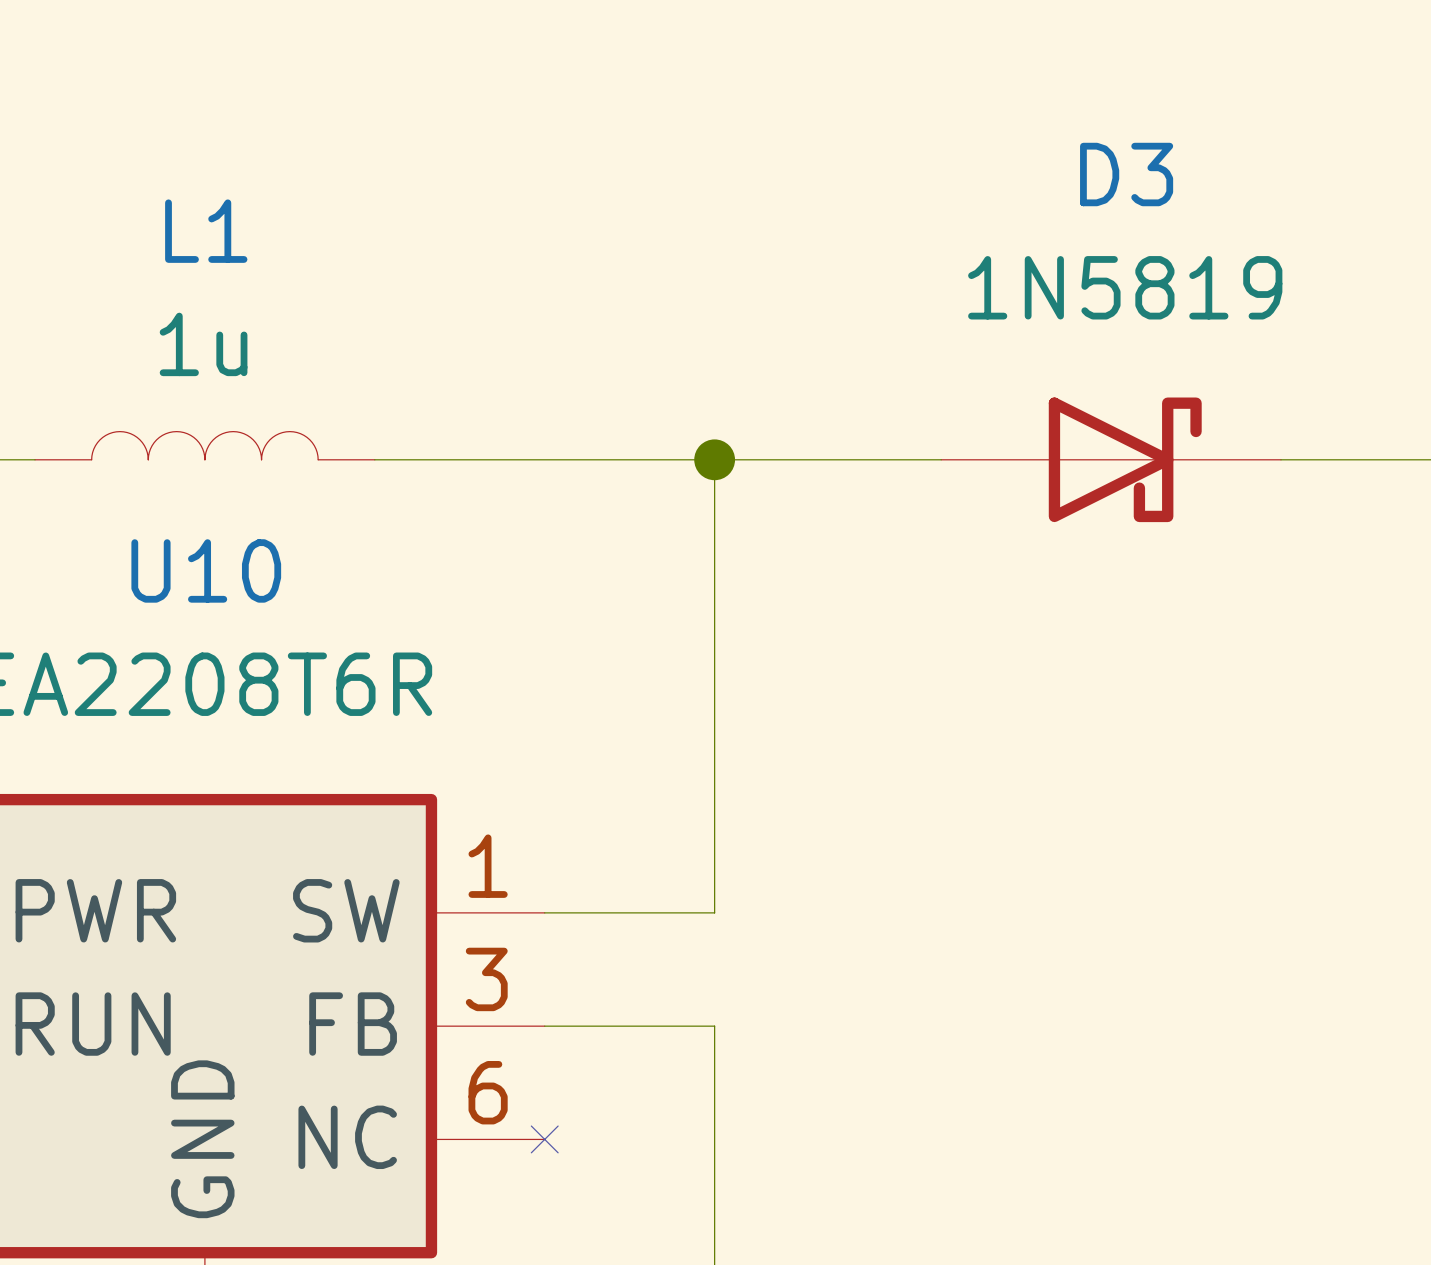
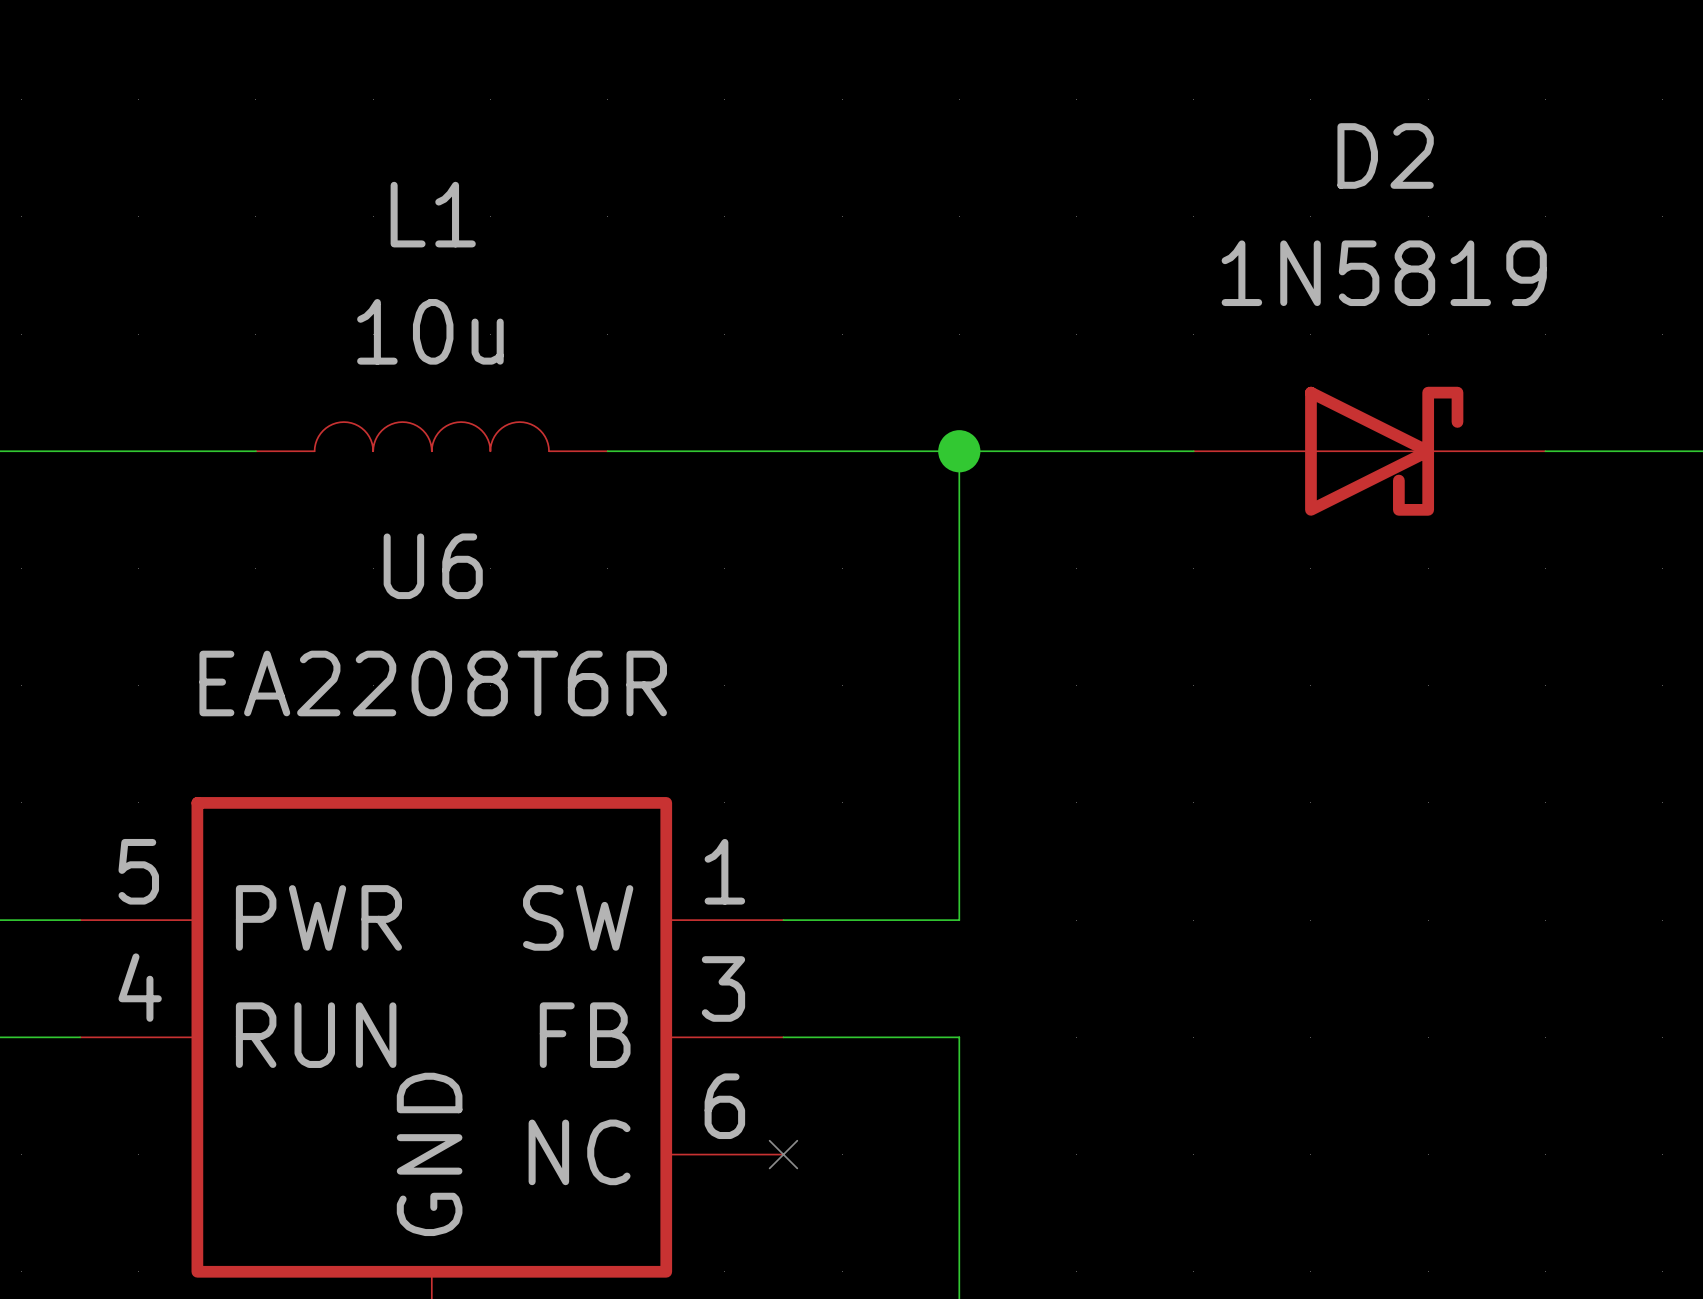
D3 name: D3 (1126, 174) -> D2 (1385, 156)
L1 value: 1u (203, 344) -> 10u (430, 331)
U10 name: U10 (206, 570) -> U6 (433, 566)

